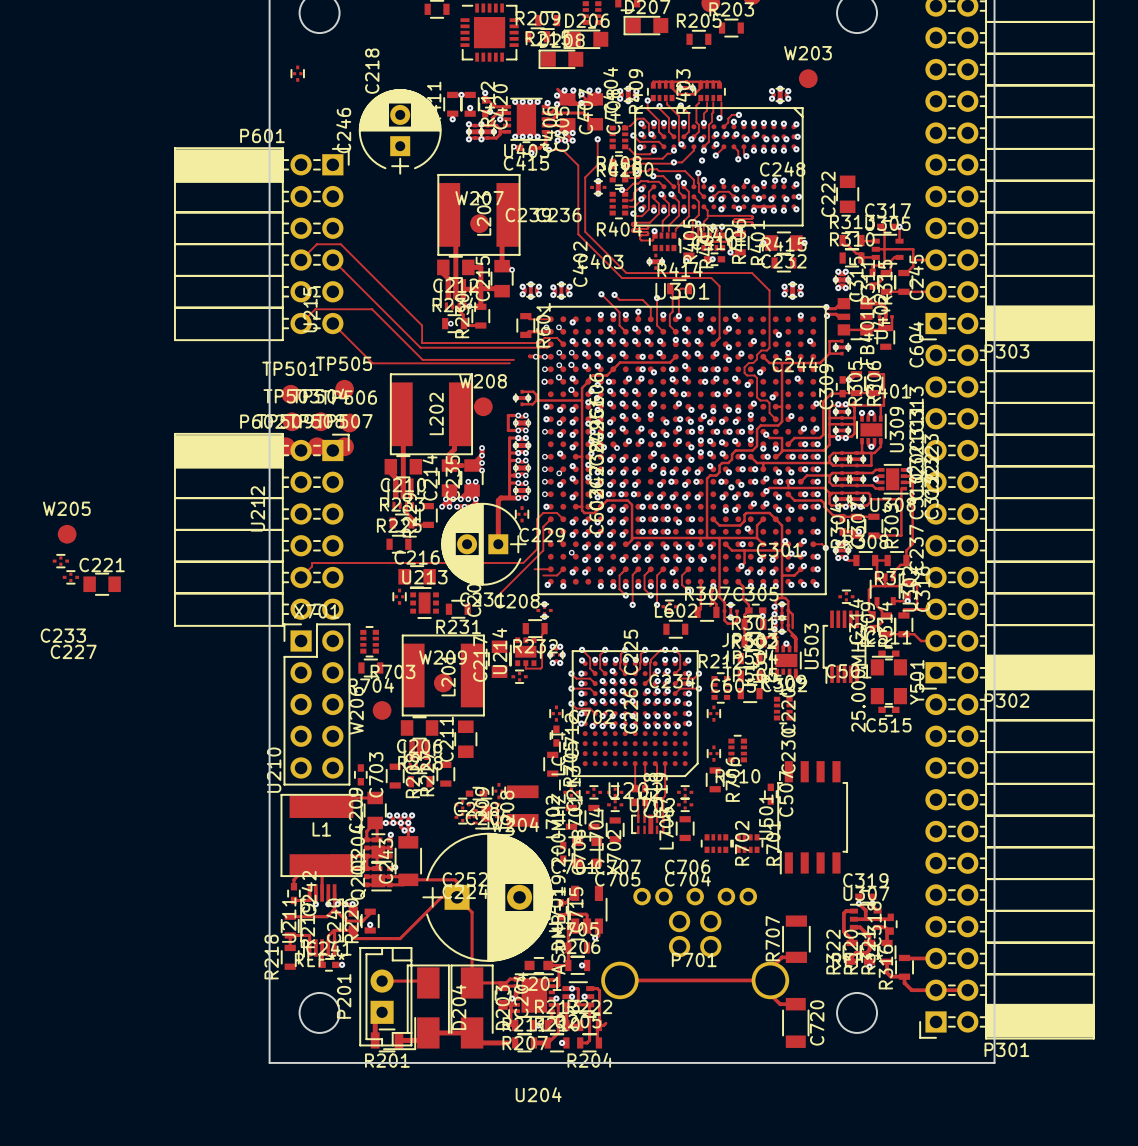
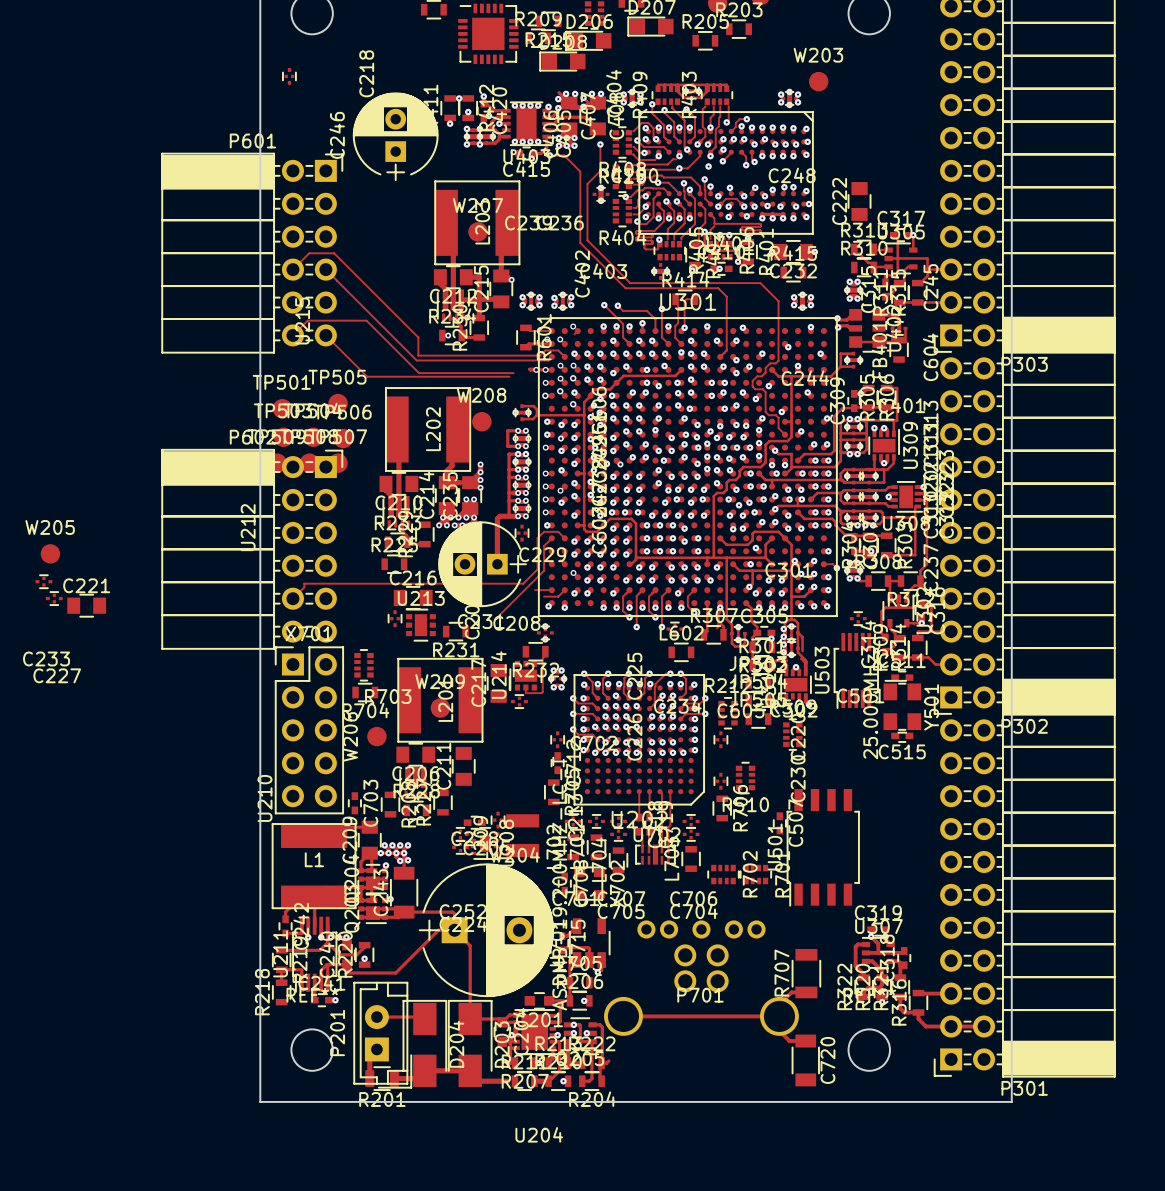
track: none -> (633, 147) (639, 152) (644, 152)
via: none -> (573, 326)
via: (572, 322) -> none

